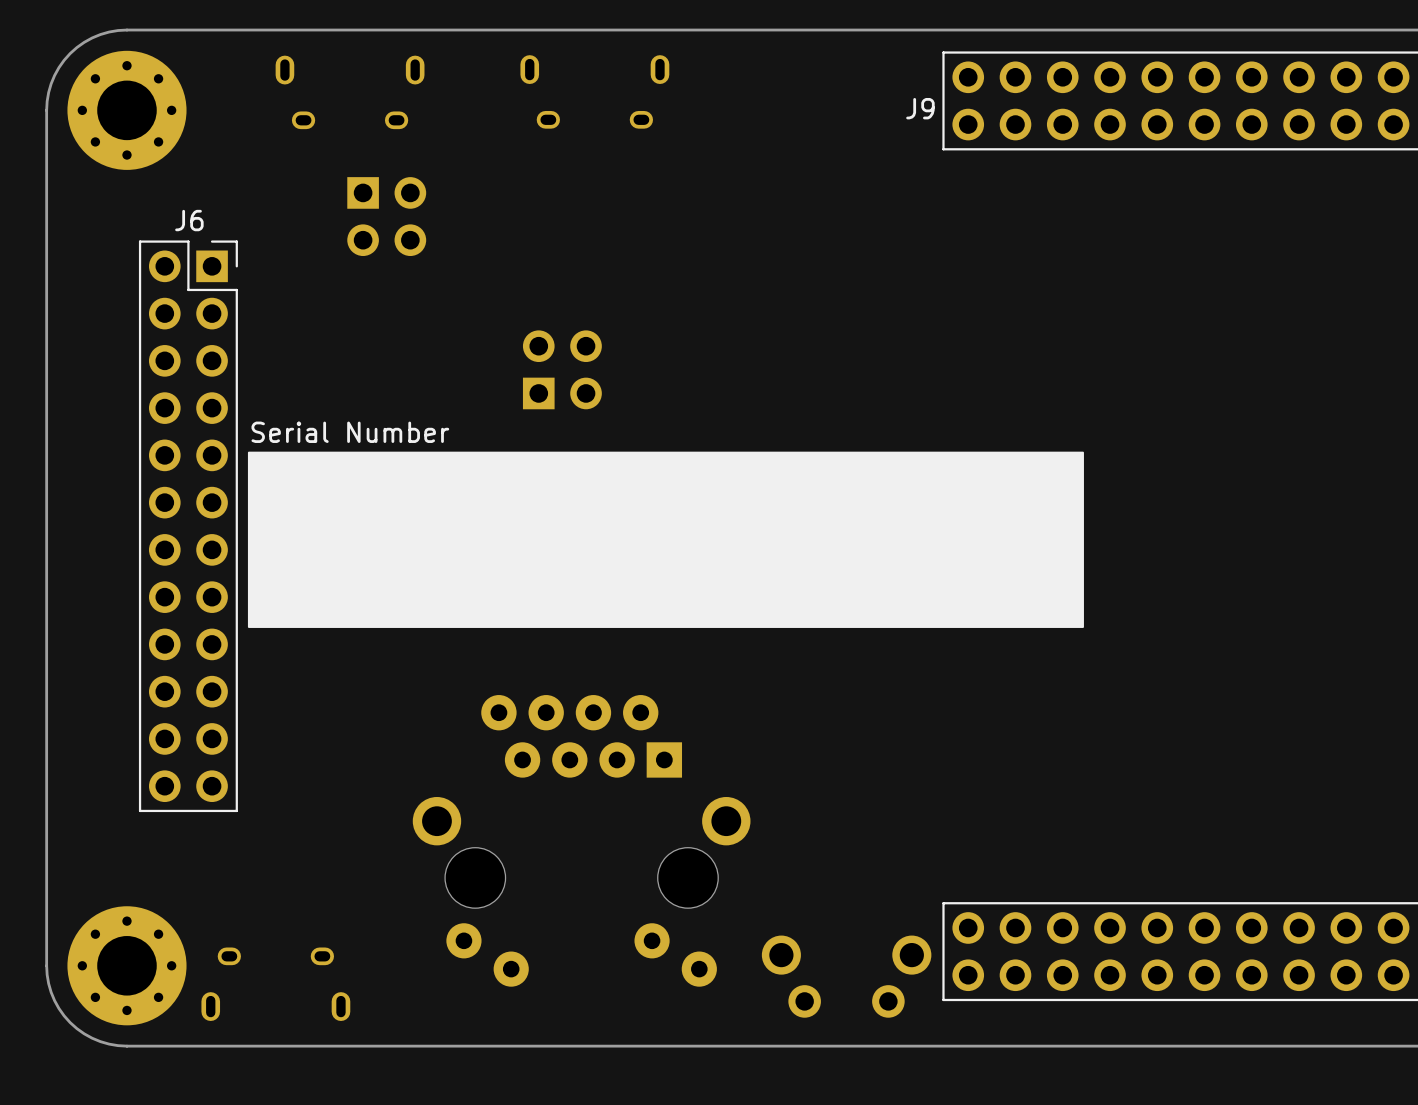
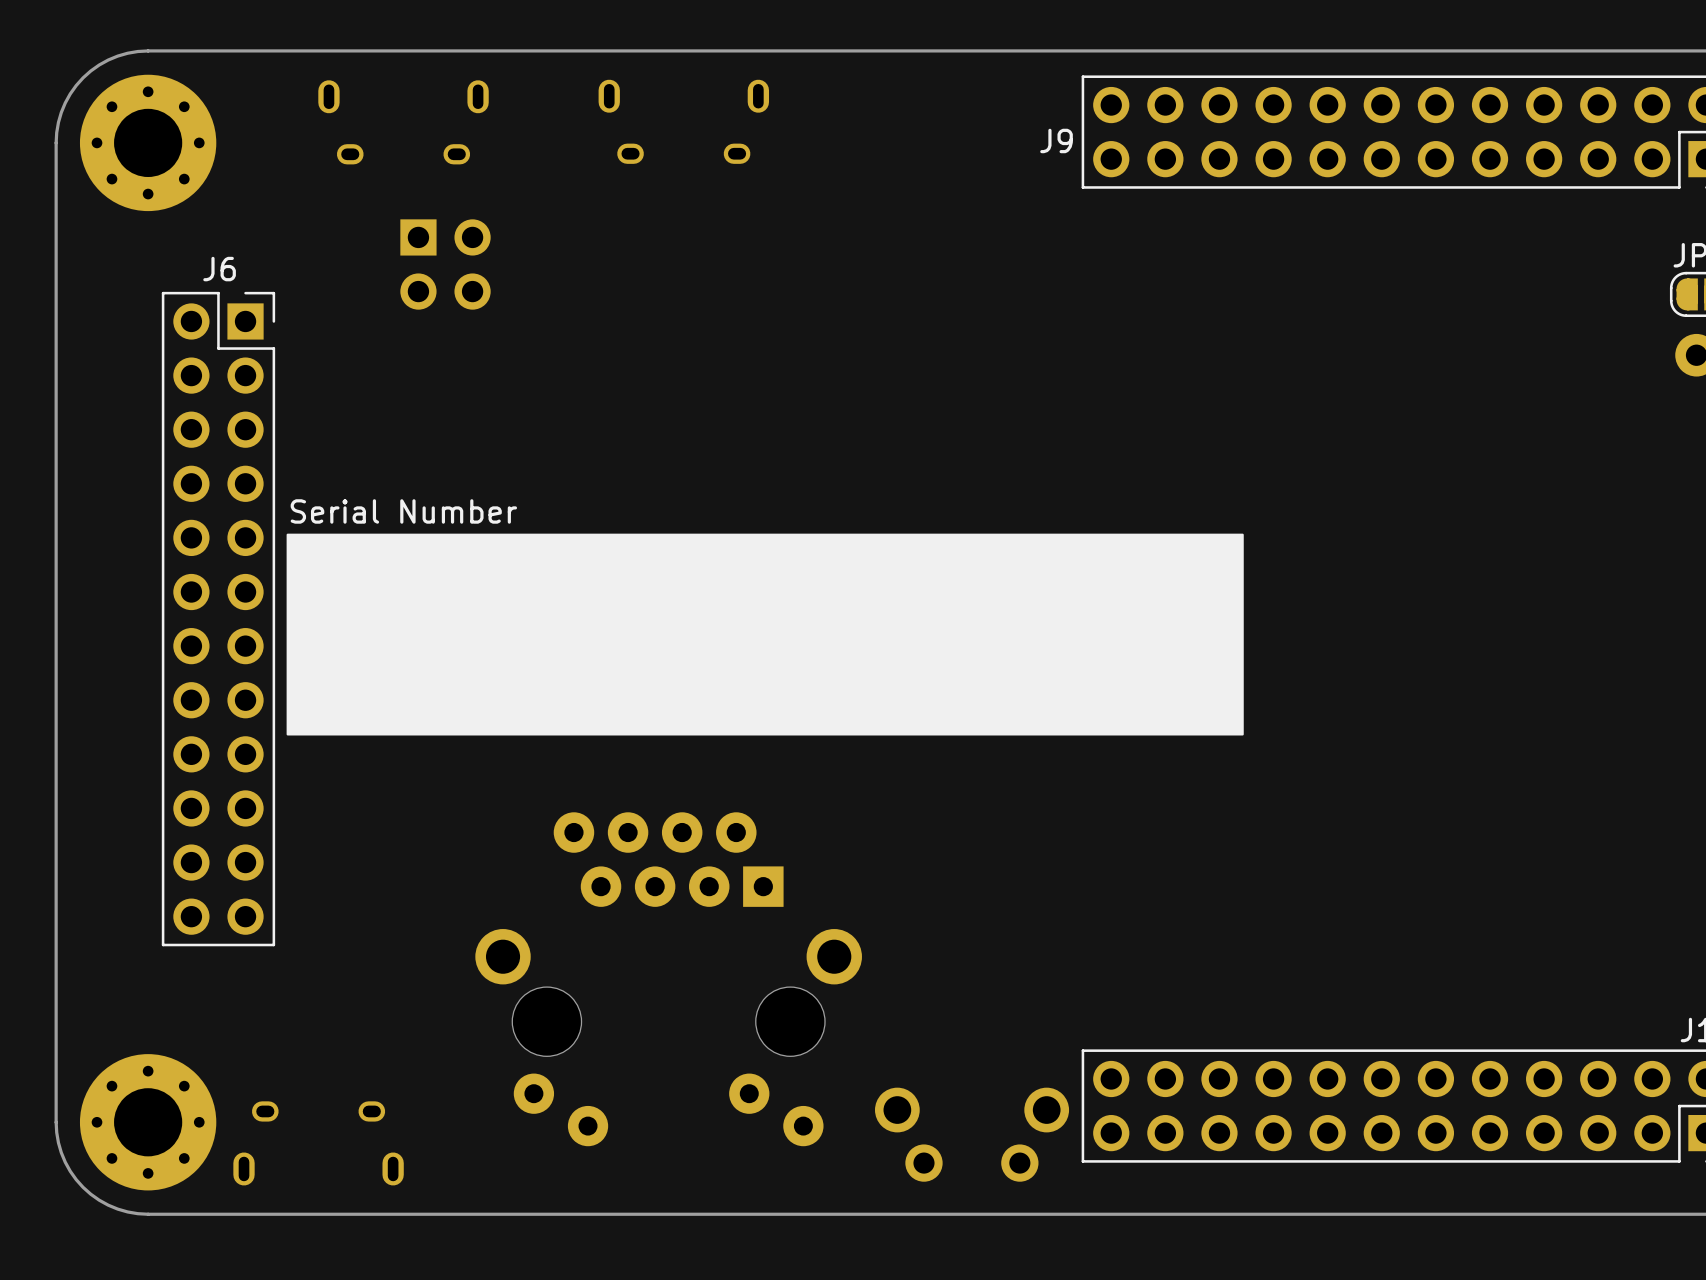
part: (562, 369) -> none

